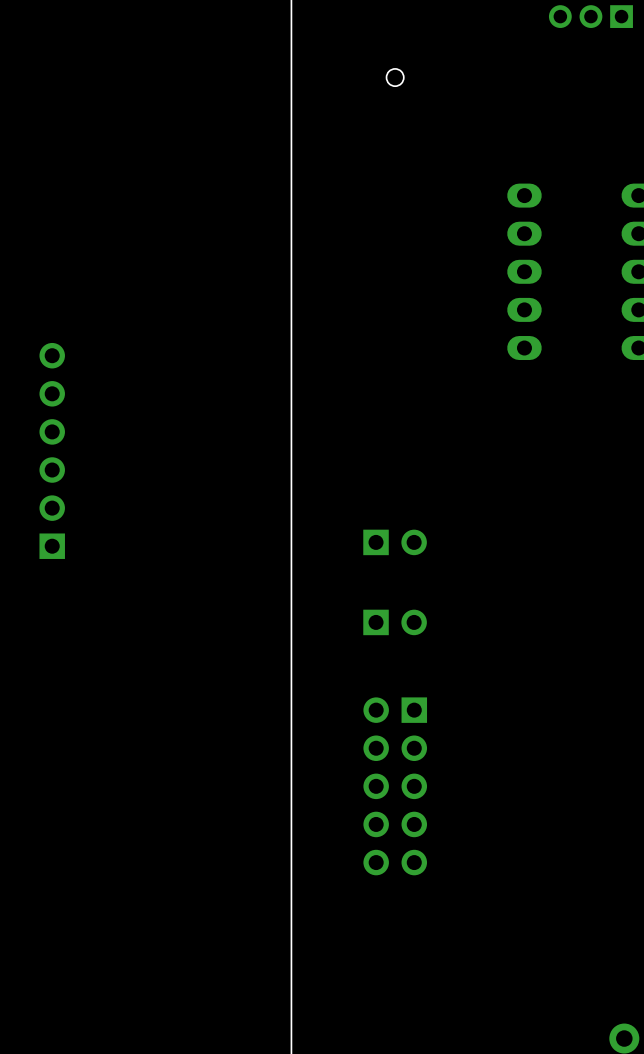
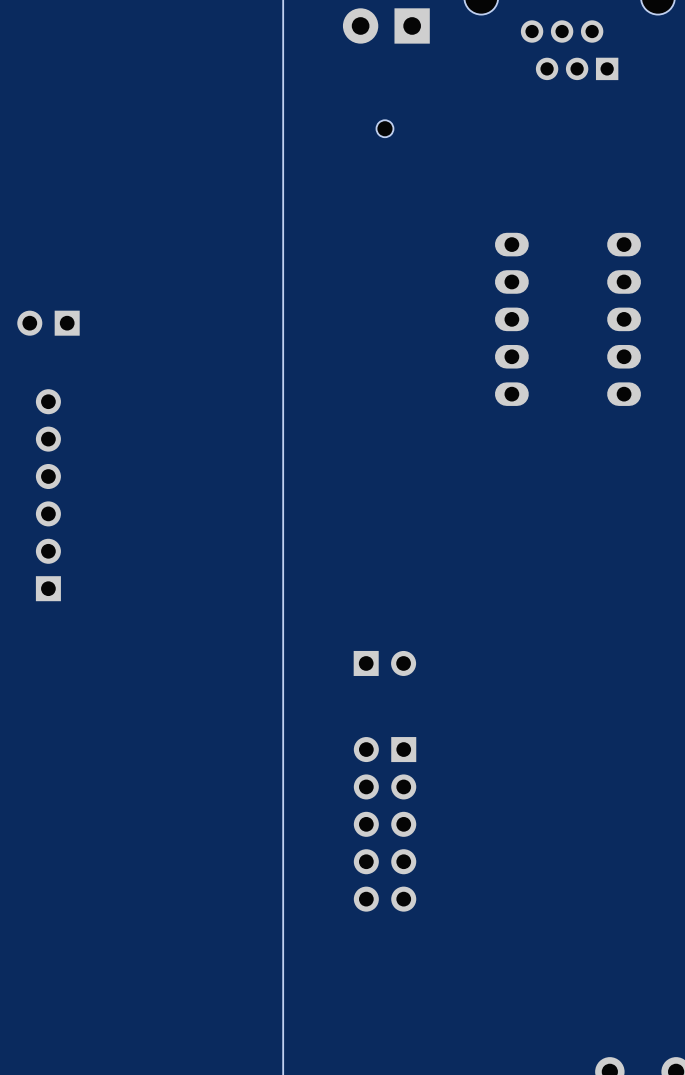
part: none -> (48, 323)
part: (395, 542) -> none

